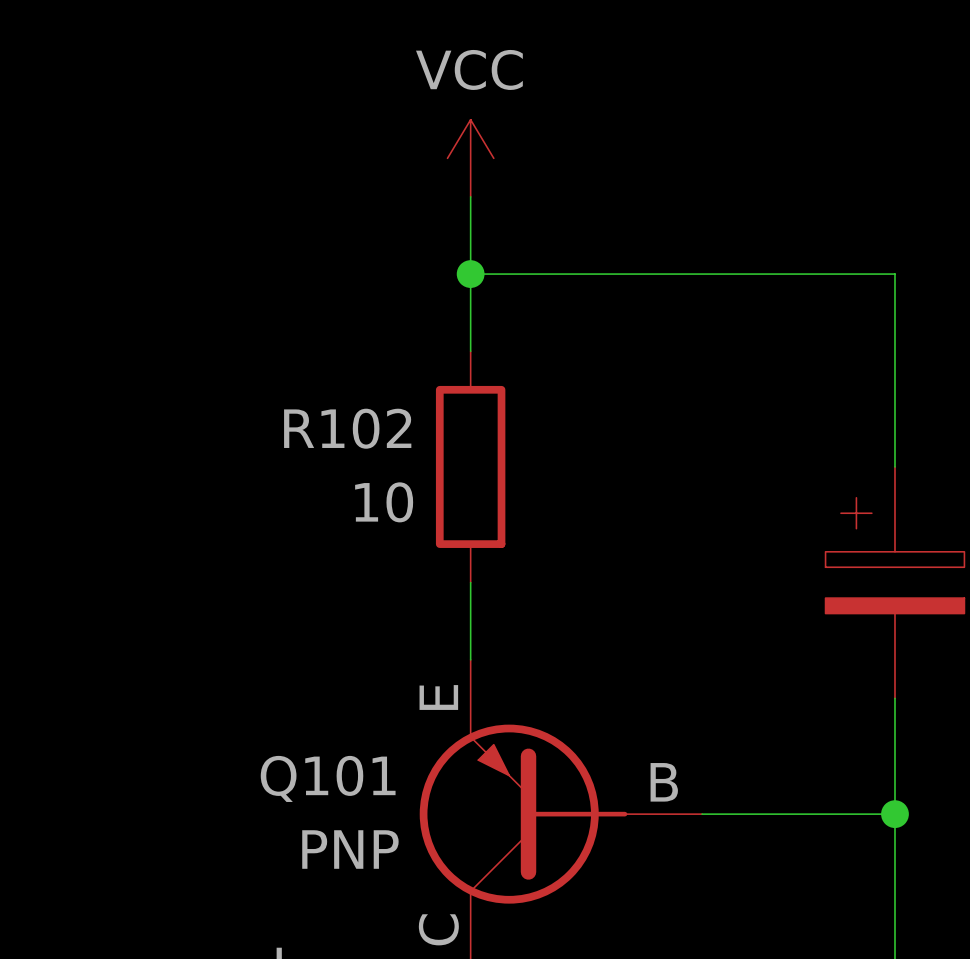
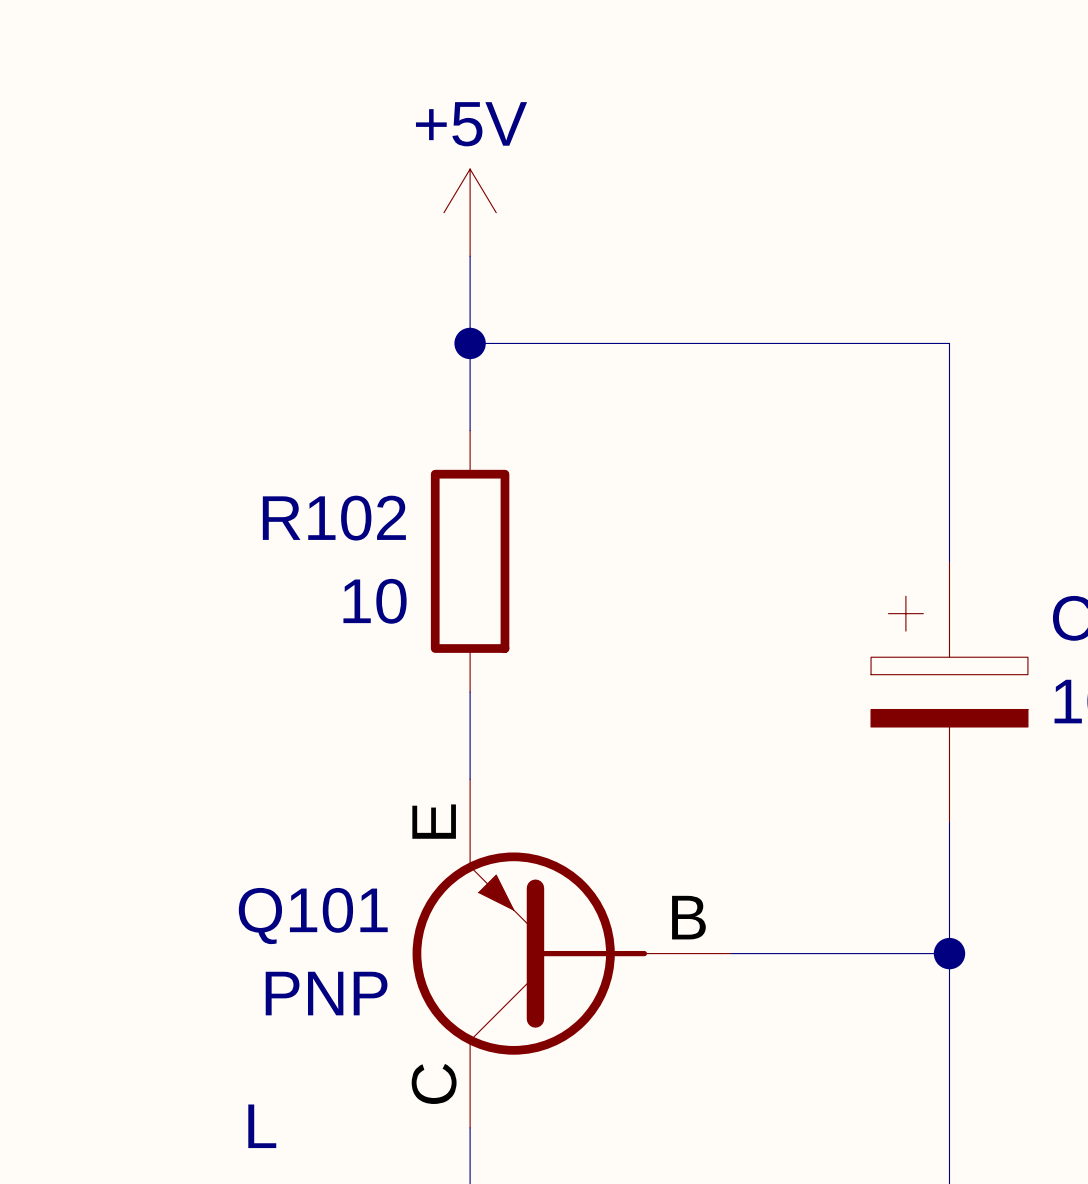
power symbol: VCC (470, 158) -> +5V (470, 212)

